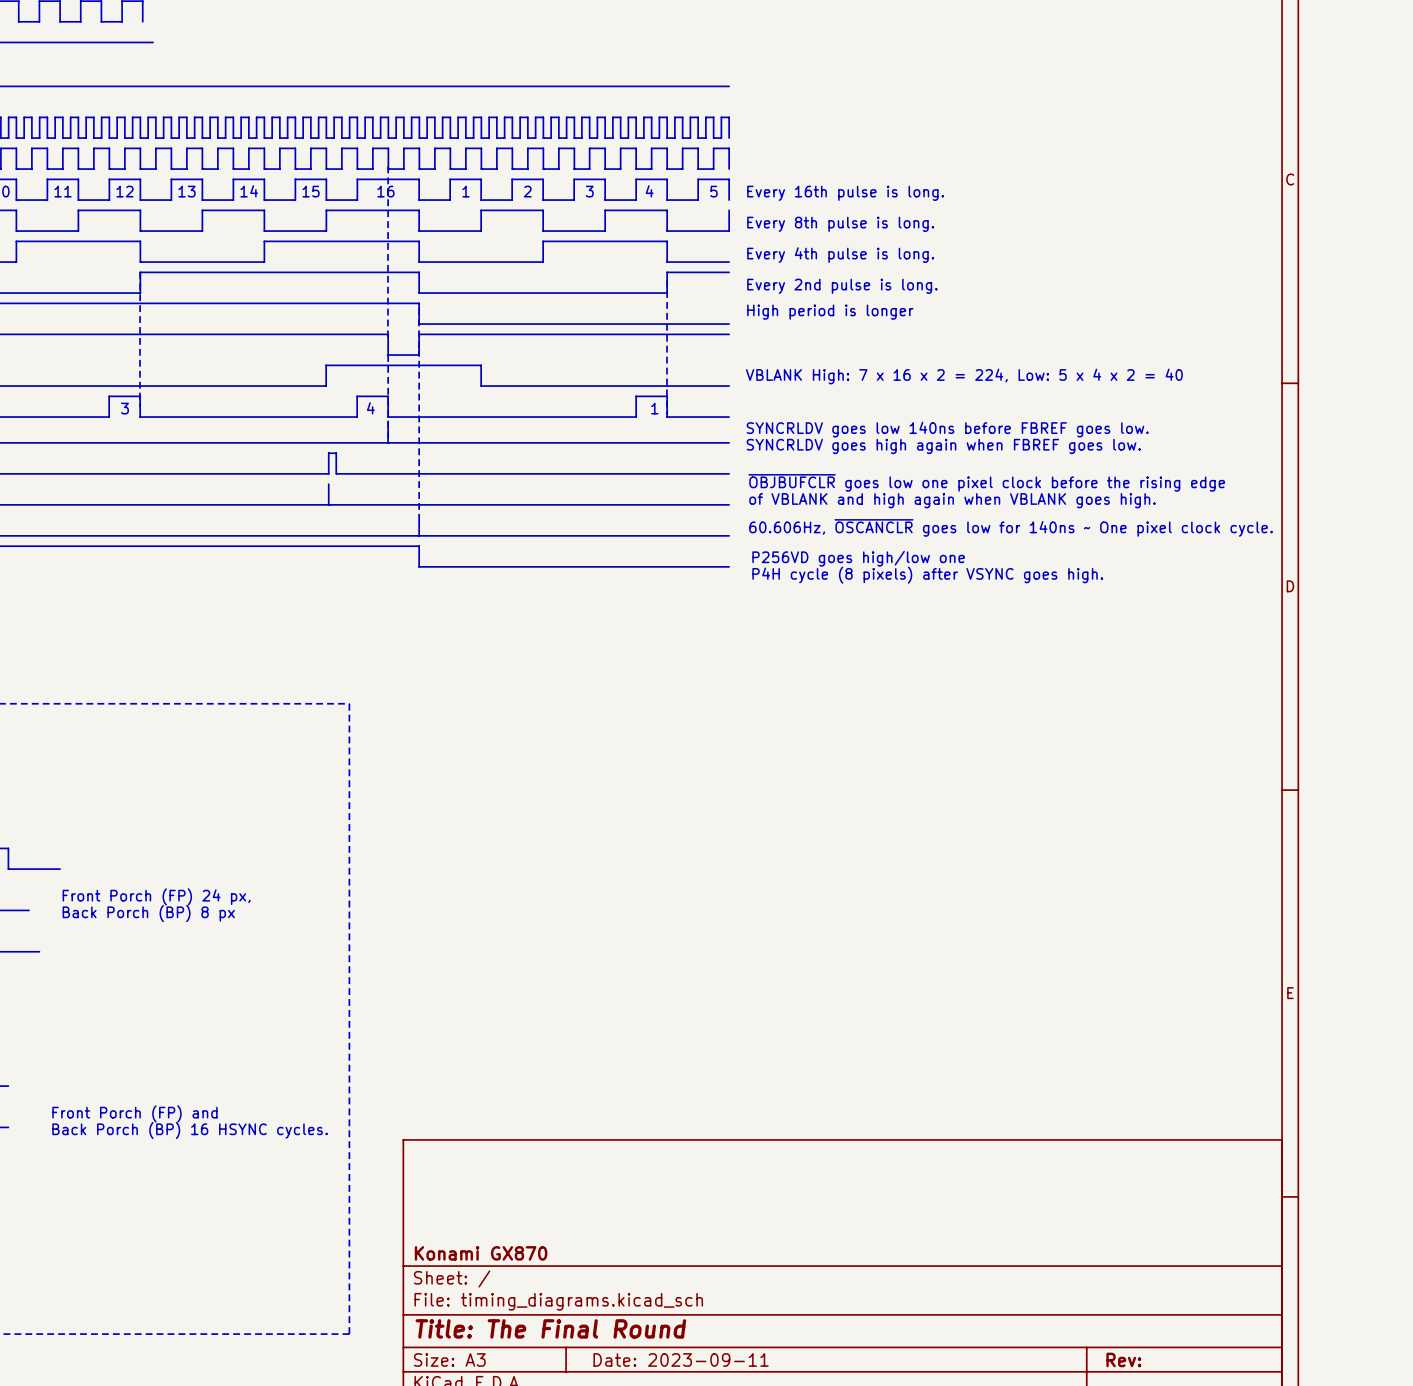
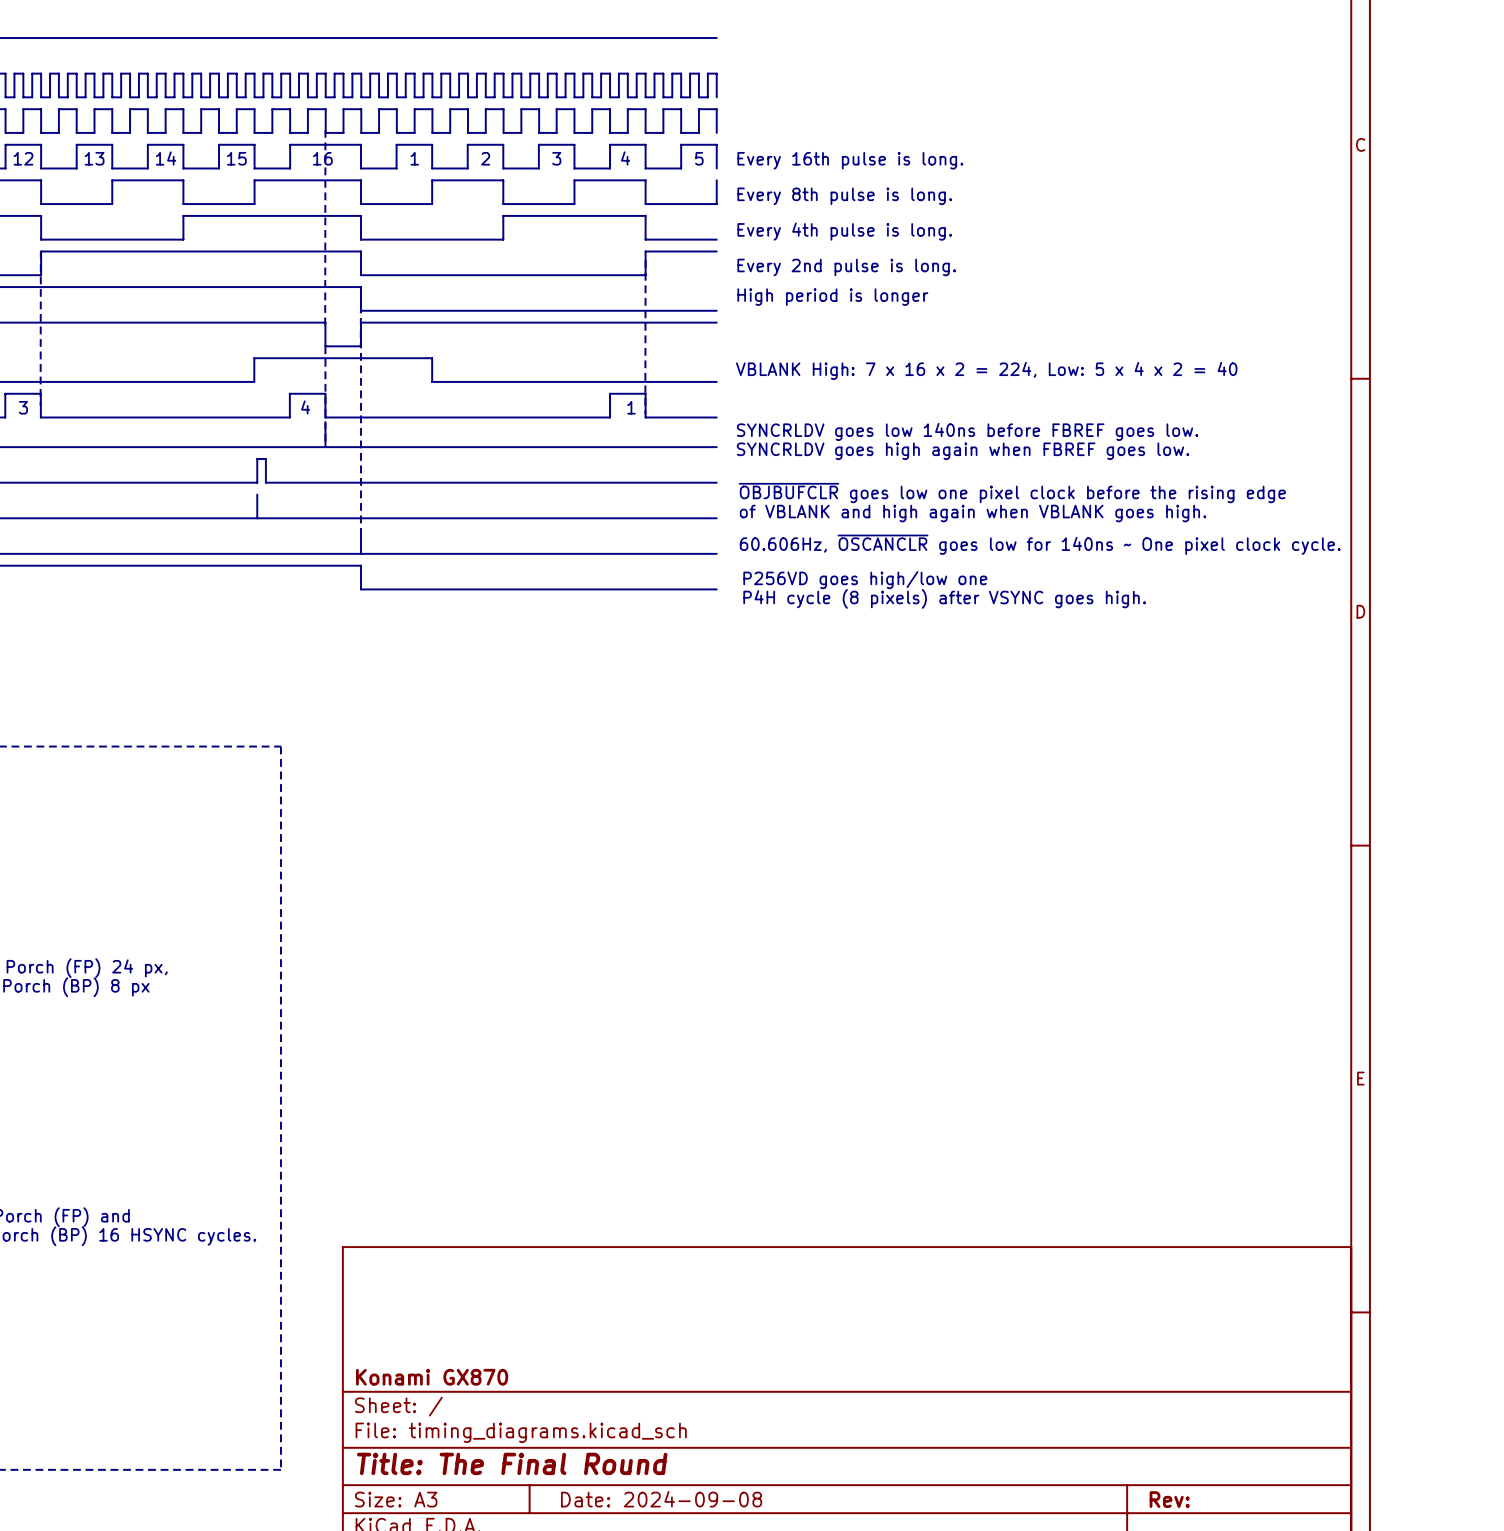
title block: Date: 2023-09-11 (681, 1359) -> Date: 2024-09-08 (661, 1499)

